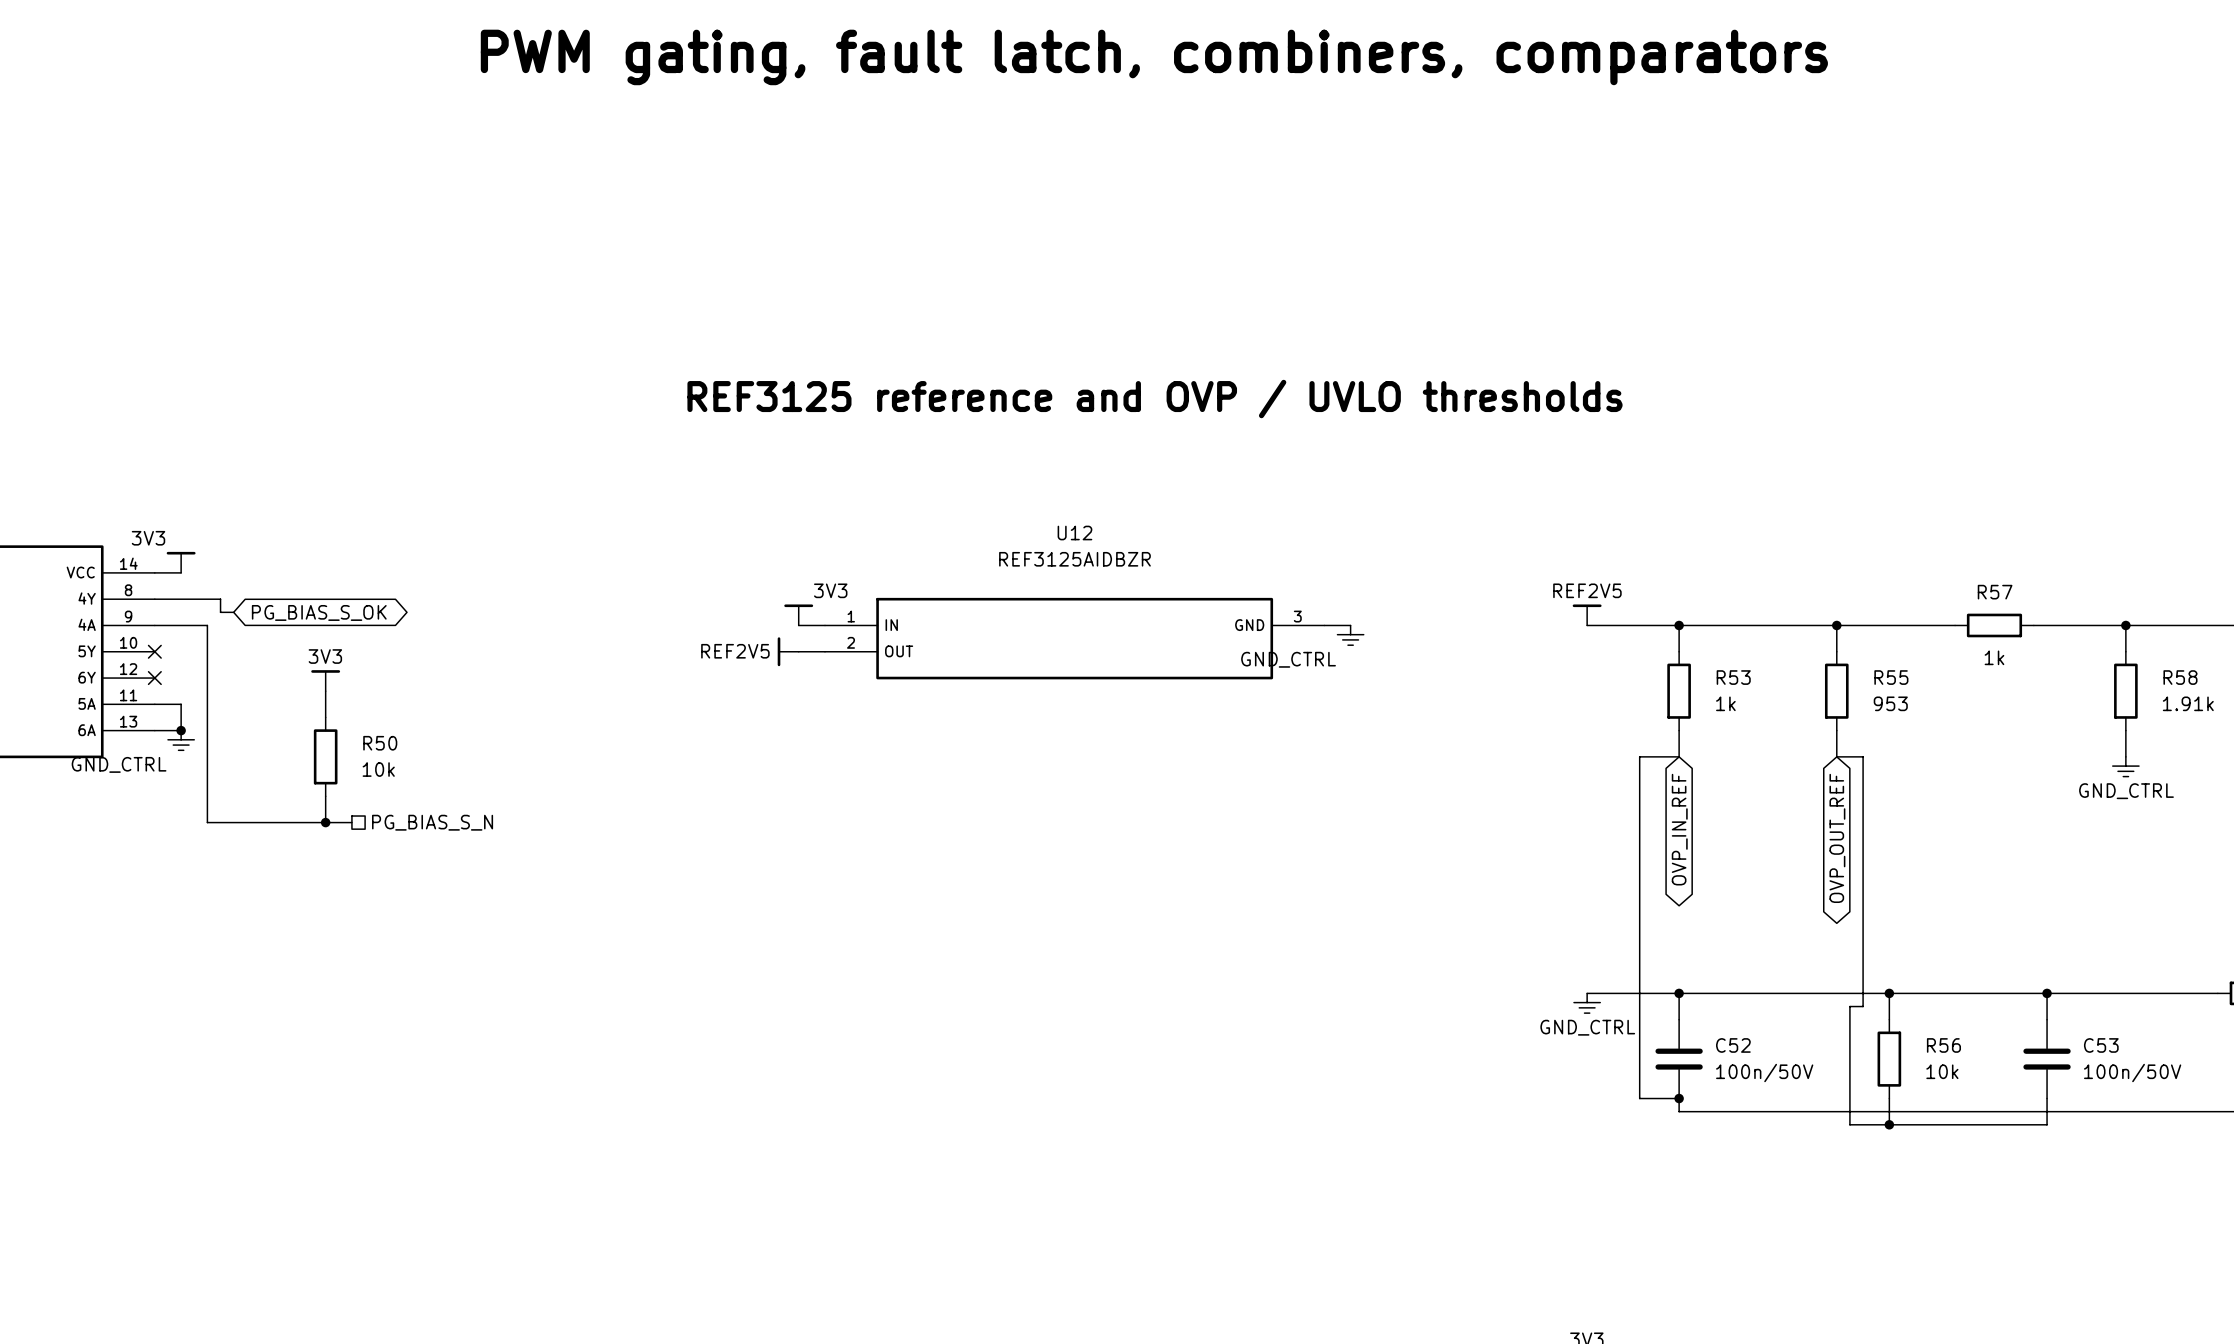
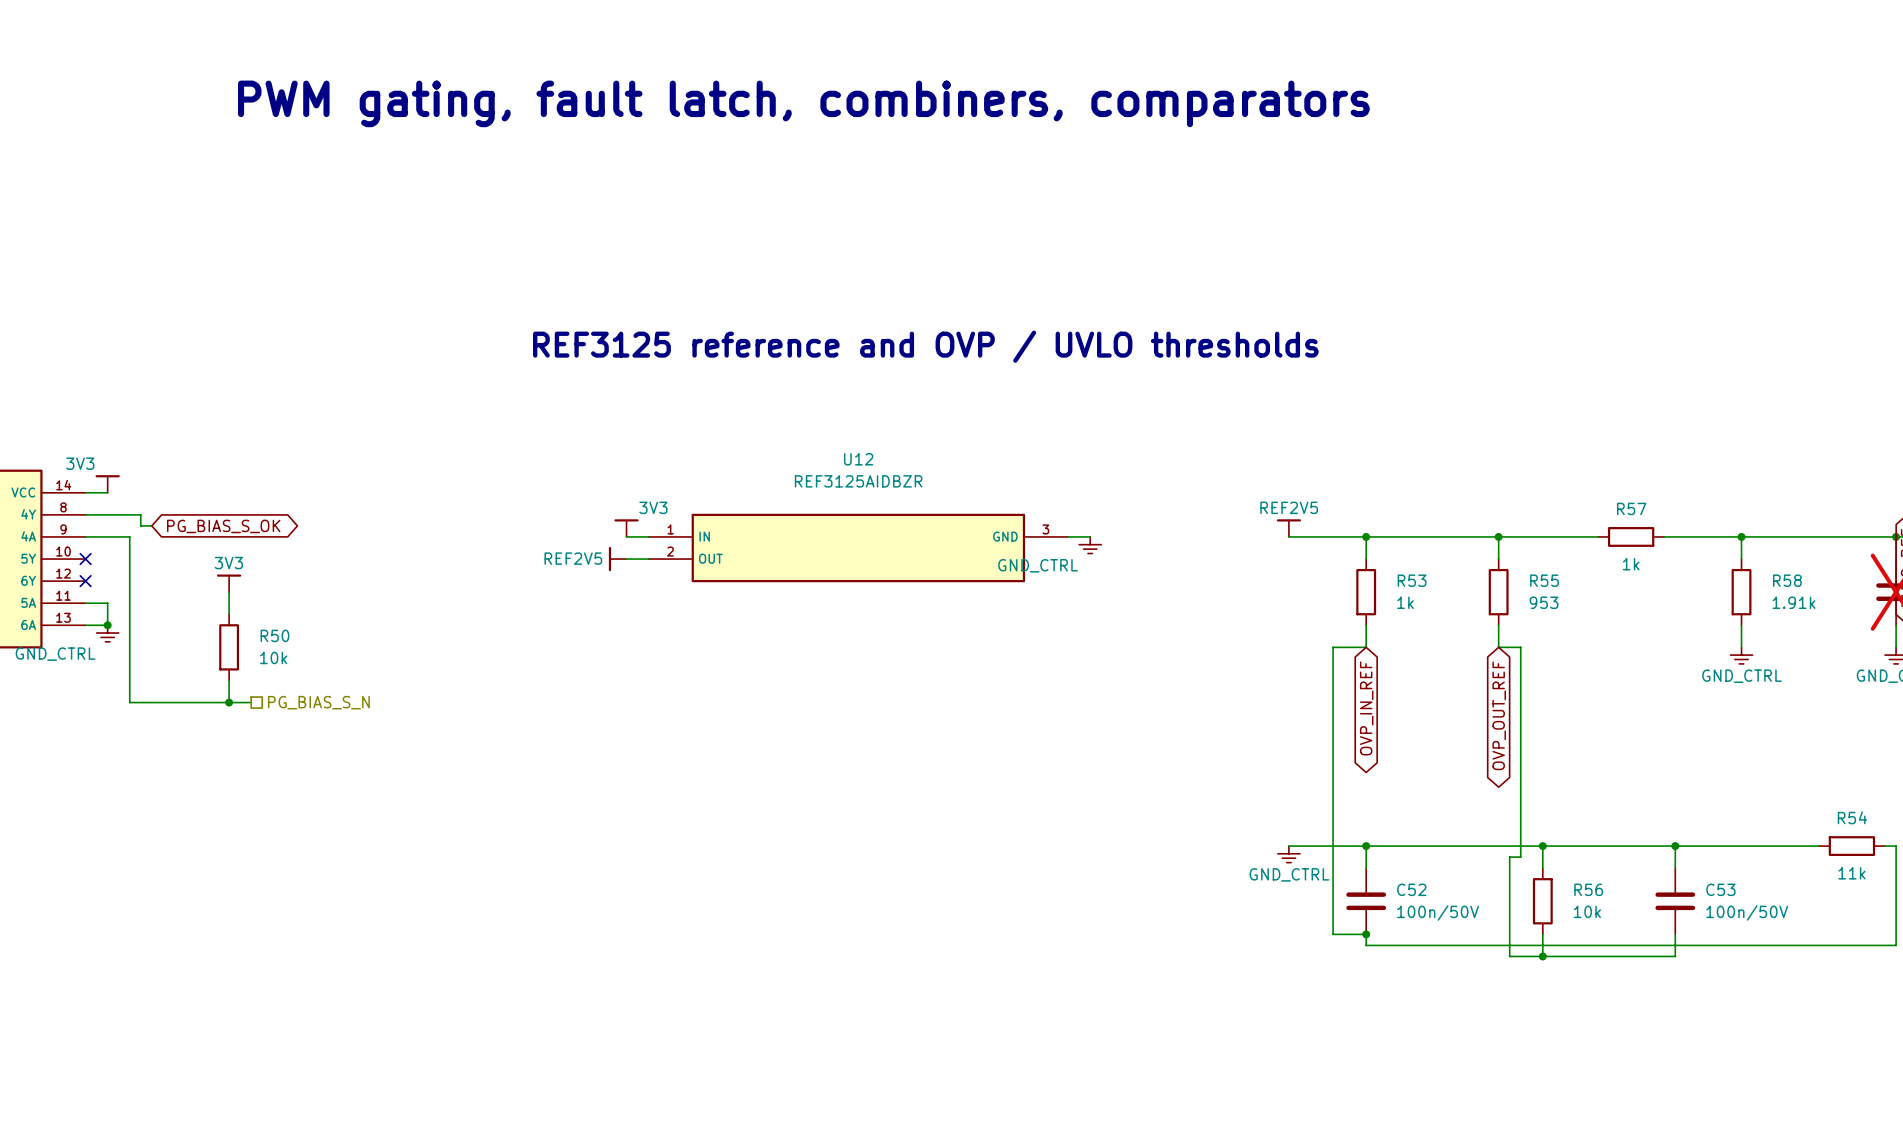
text position: PWM gating, fault latch, combiners, comparators (1154, 57) -> PWM gating, fault latch, combiners, comparators (803, 103)

